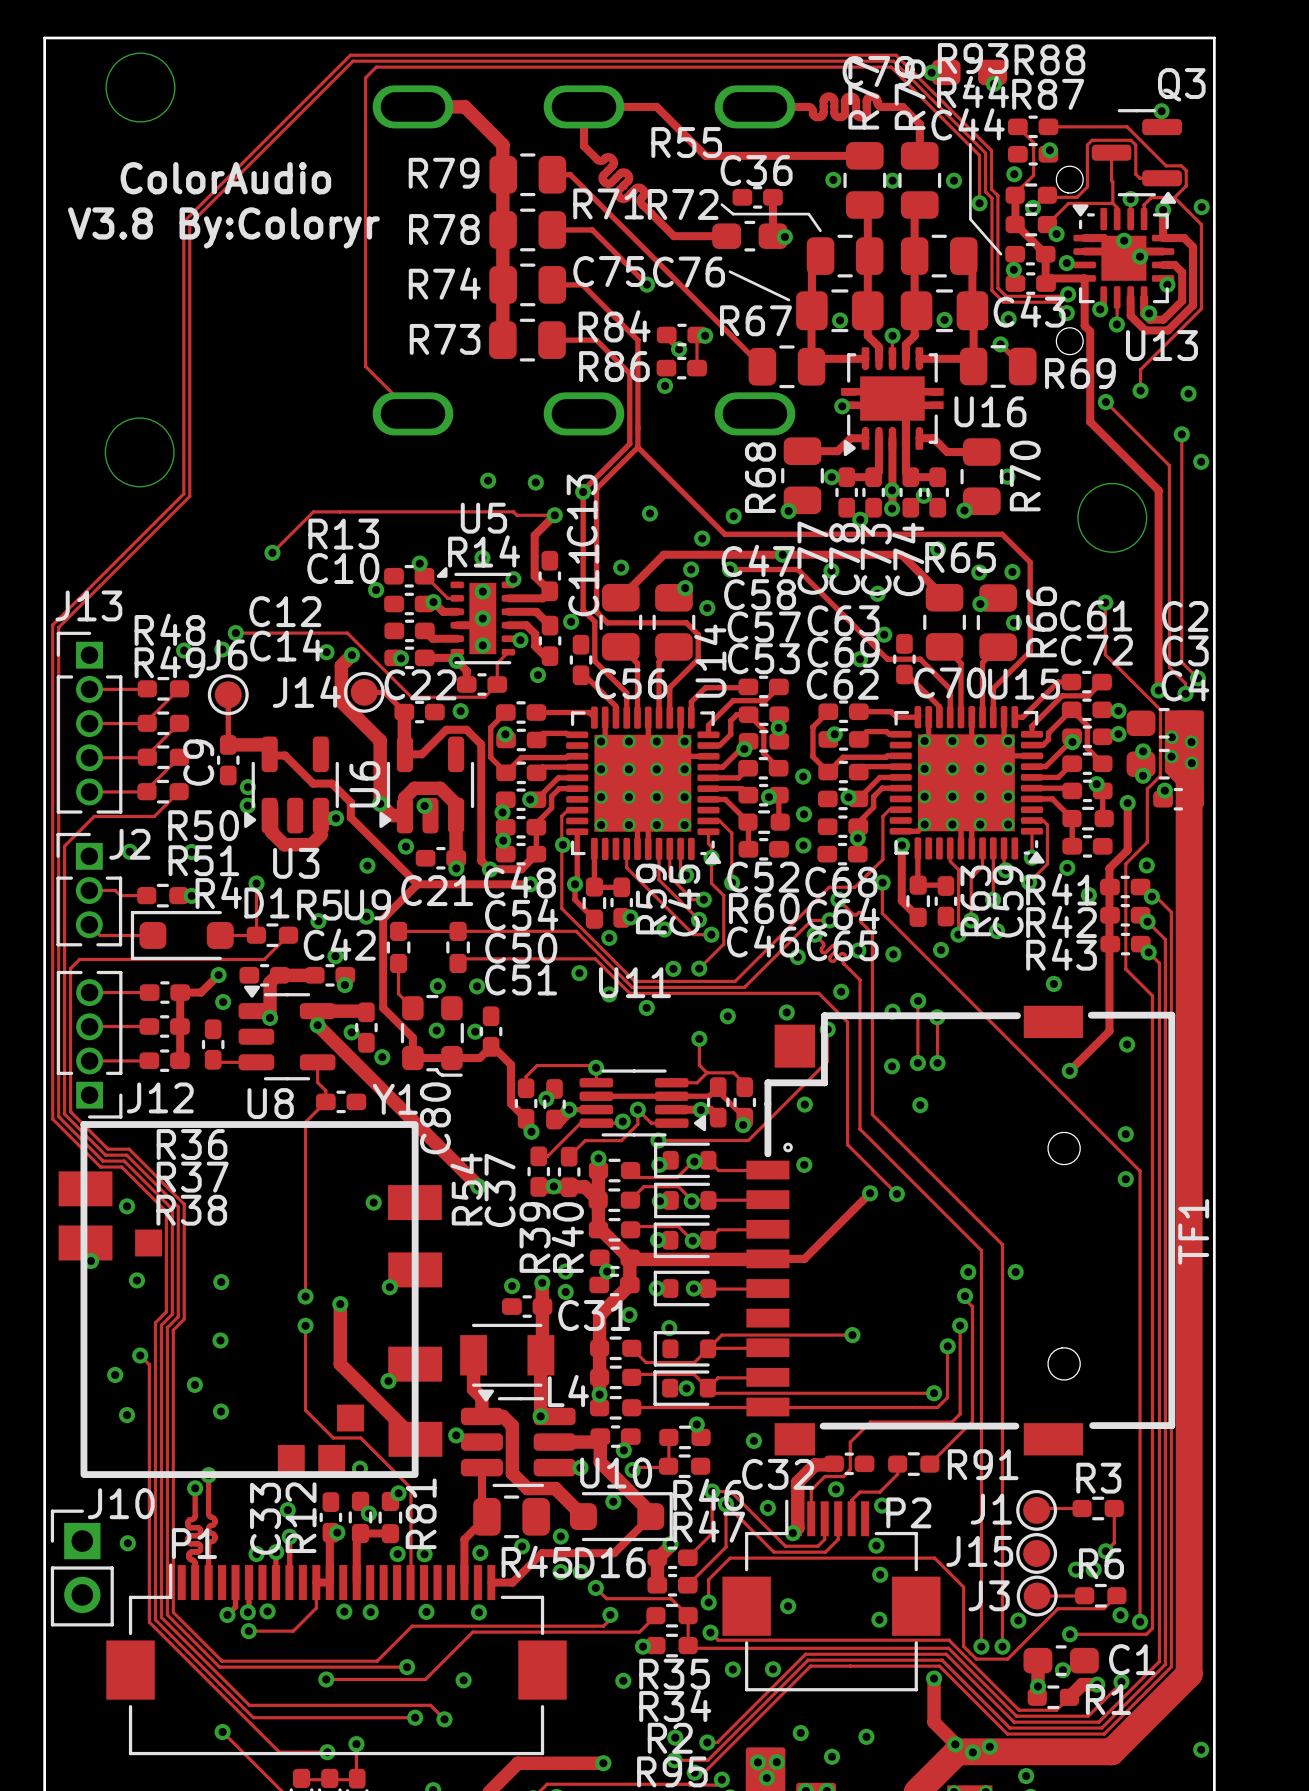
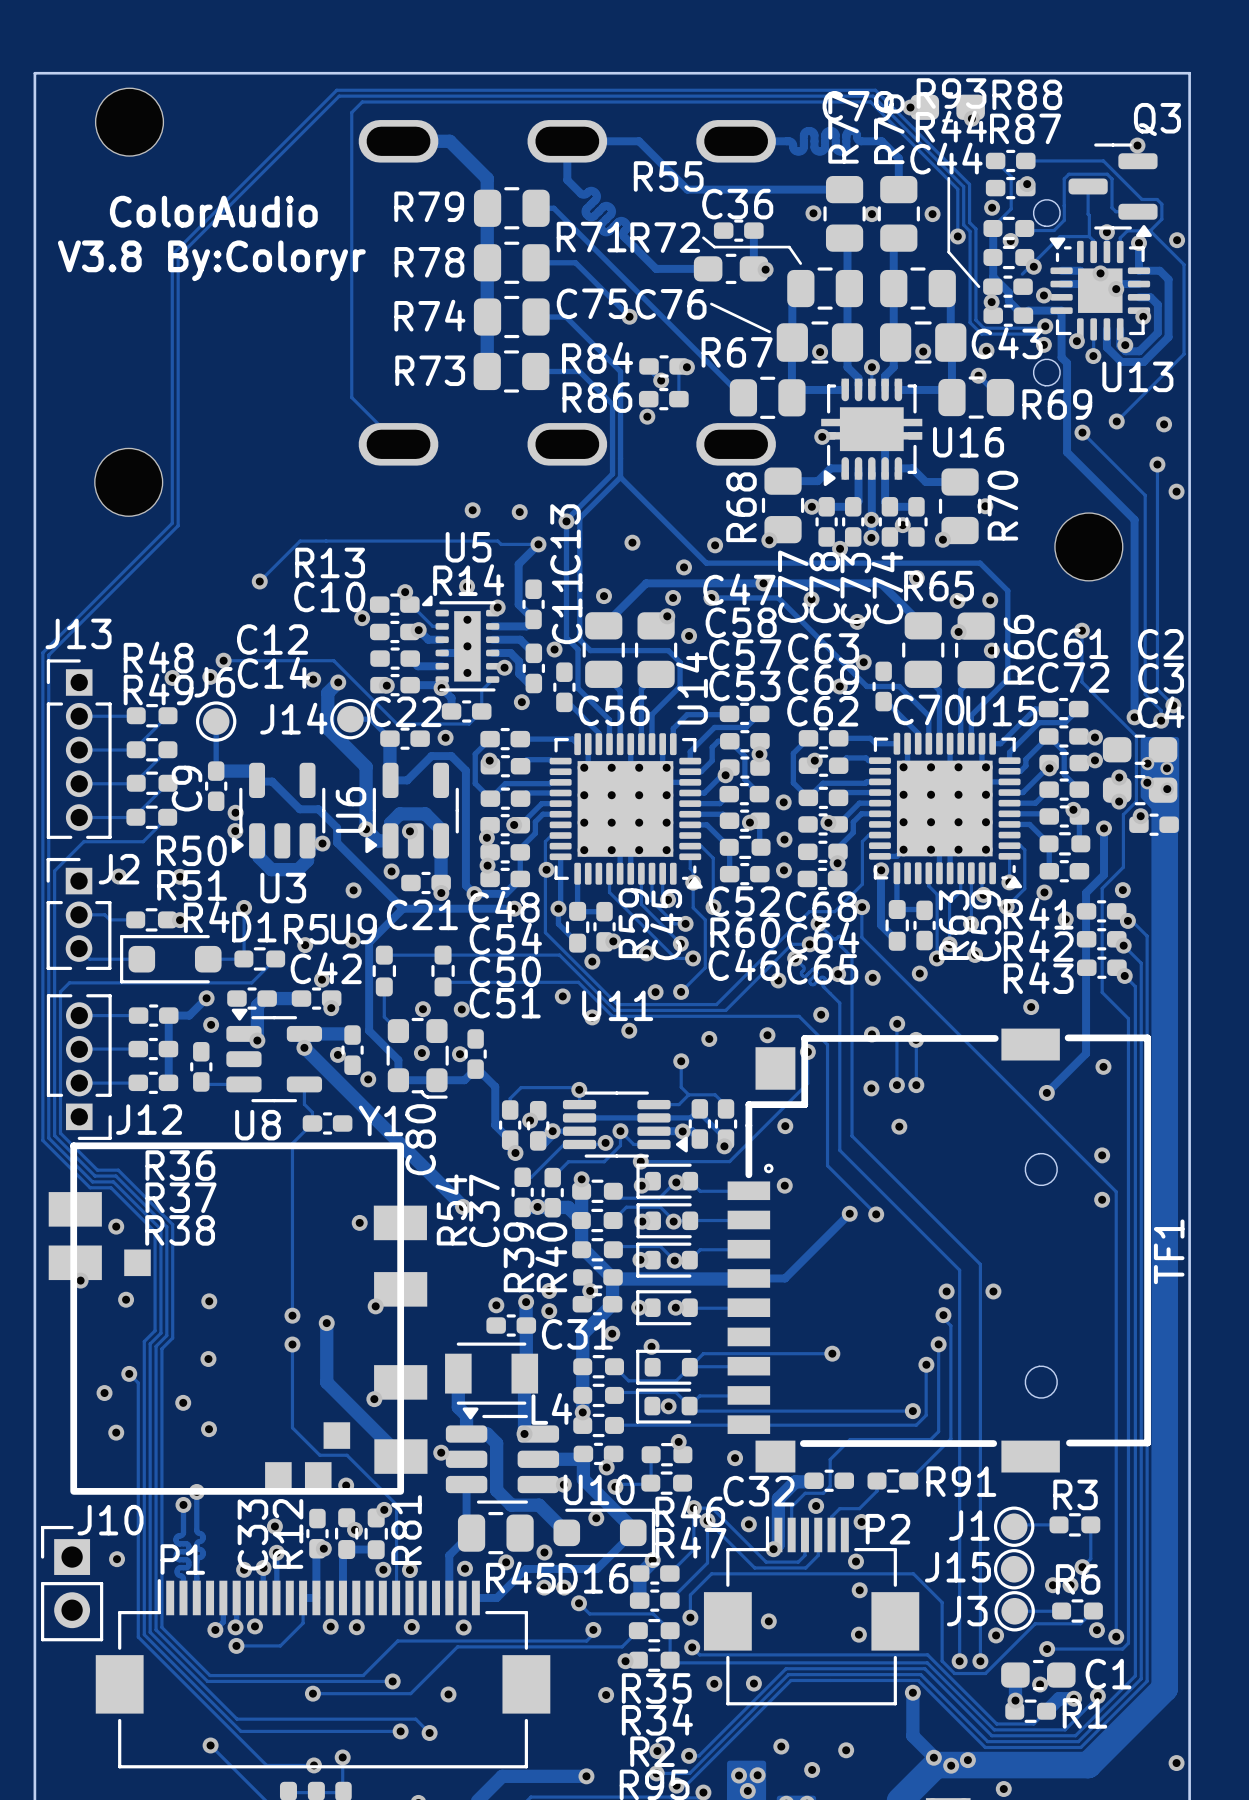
track: (1083, 203) (1068, 203) (1047, 224) -> (1059, 236) (1022, 274)
track: (1015, 223) (1045, 254) (1045, 283) -> (993, 256) (993, 276) (1008, 292) (1008, 301) (1023, 315)
track: (1201, 224) (1201, 308) (1140, 369) (1140, 390) -> (1176, 257) (1184, 264) (1184, 354) (1116, 421)

